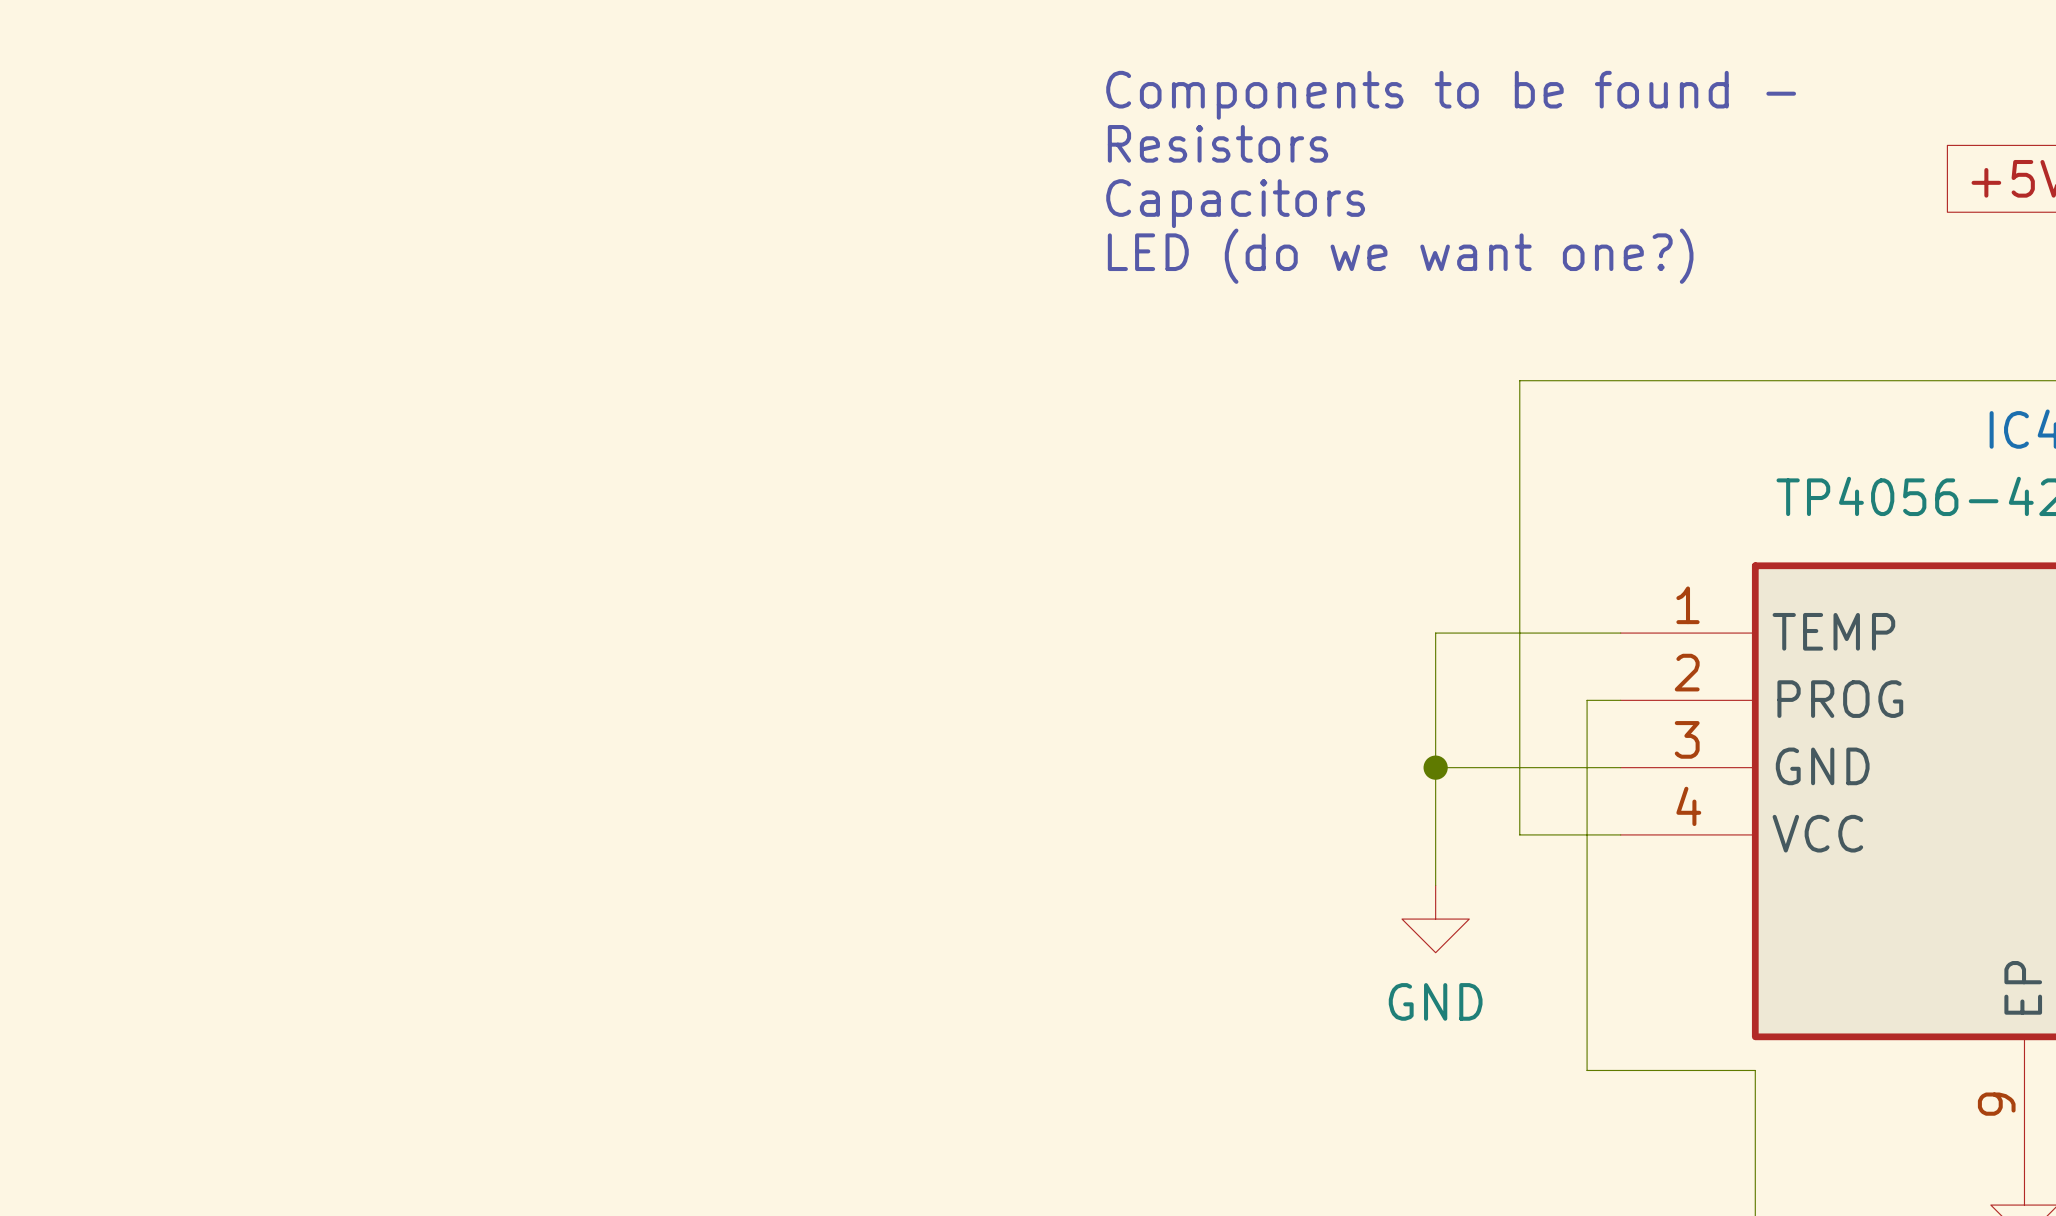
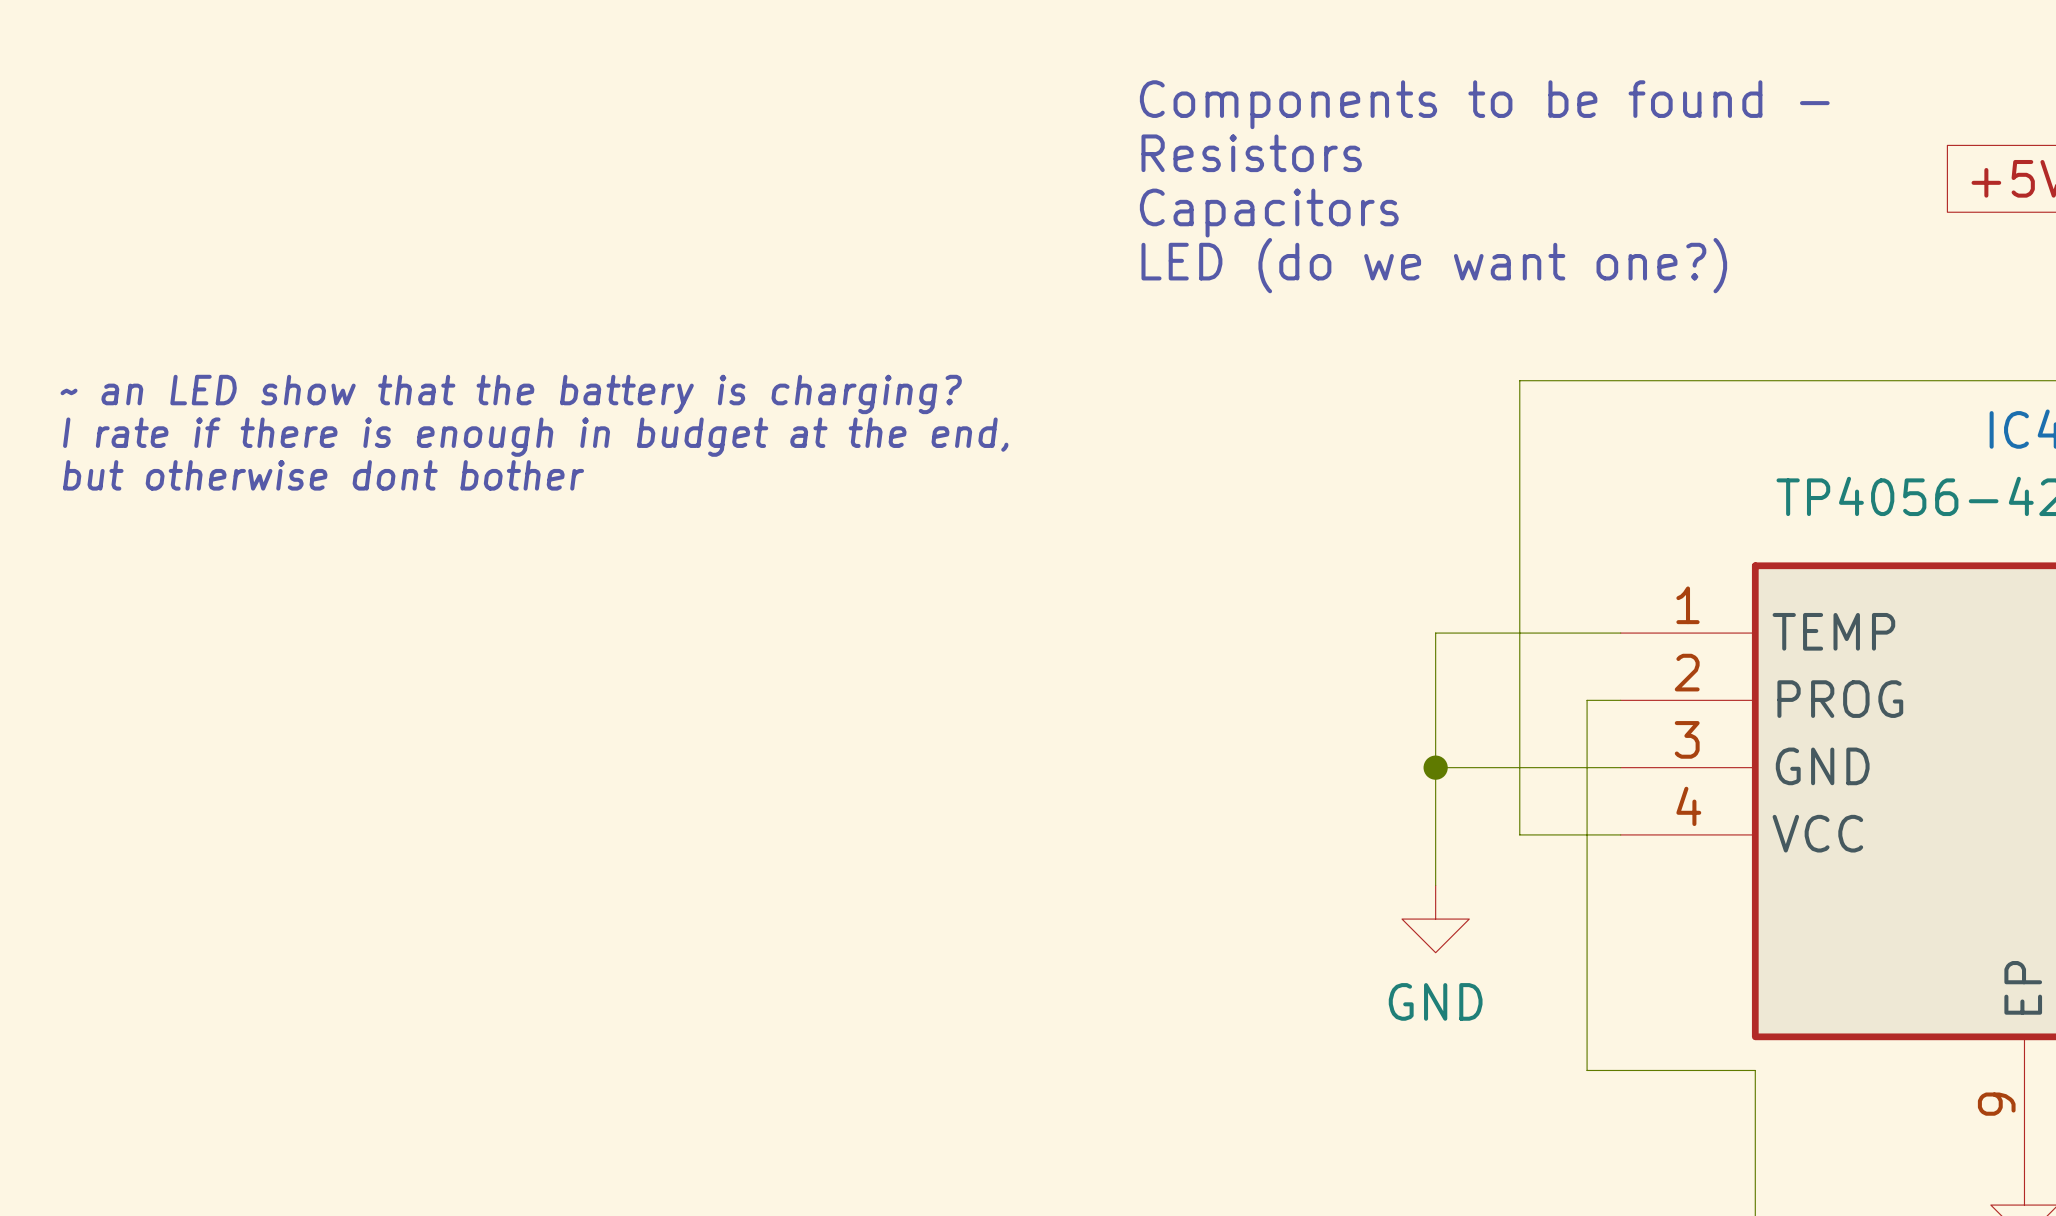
text position: Components to be found - (1451, 95) -> Components to be found - (1484, 104)
text position: Resistors (1218, 143) -> Resistors (1251, 153)
text position: Capacitors (1235, 203) -> Capacitors (1269, 213)
text position: LED (do we want one?) (1400, 256) -> LED (do we want one?) (1434, 265)
text: none -> ~ an LED show that the battery is charging? (511, 394)
text: none -> I rate if there is enough in budget at the end, (535, 437)
text: none -> but otherwise dont bother (323, 475)

